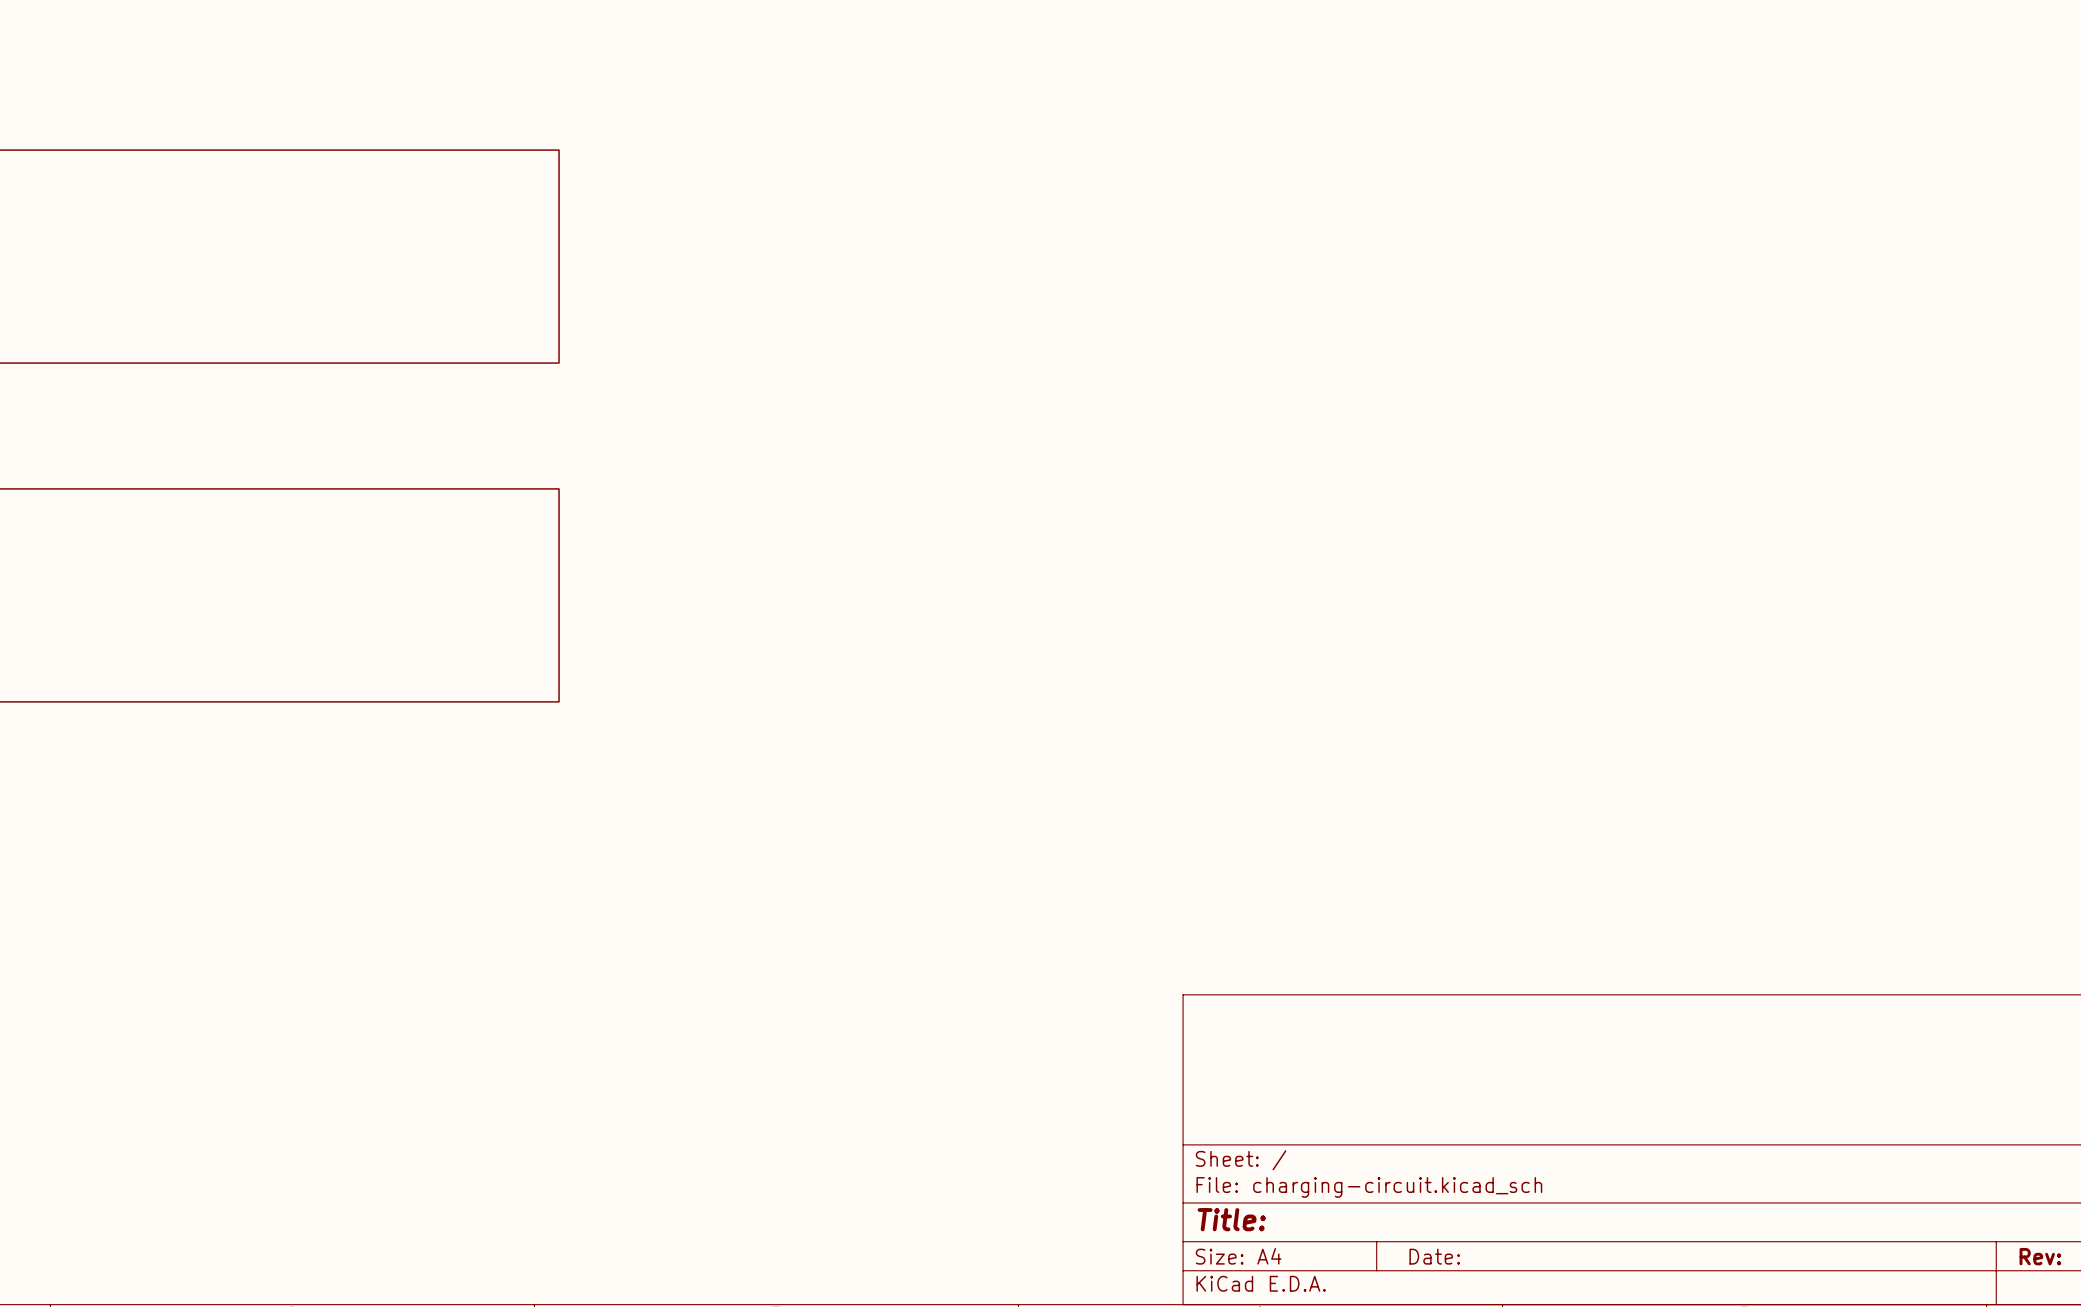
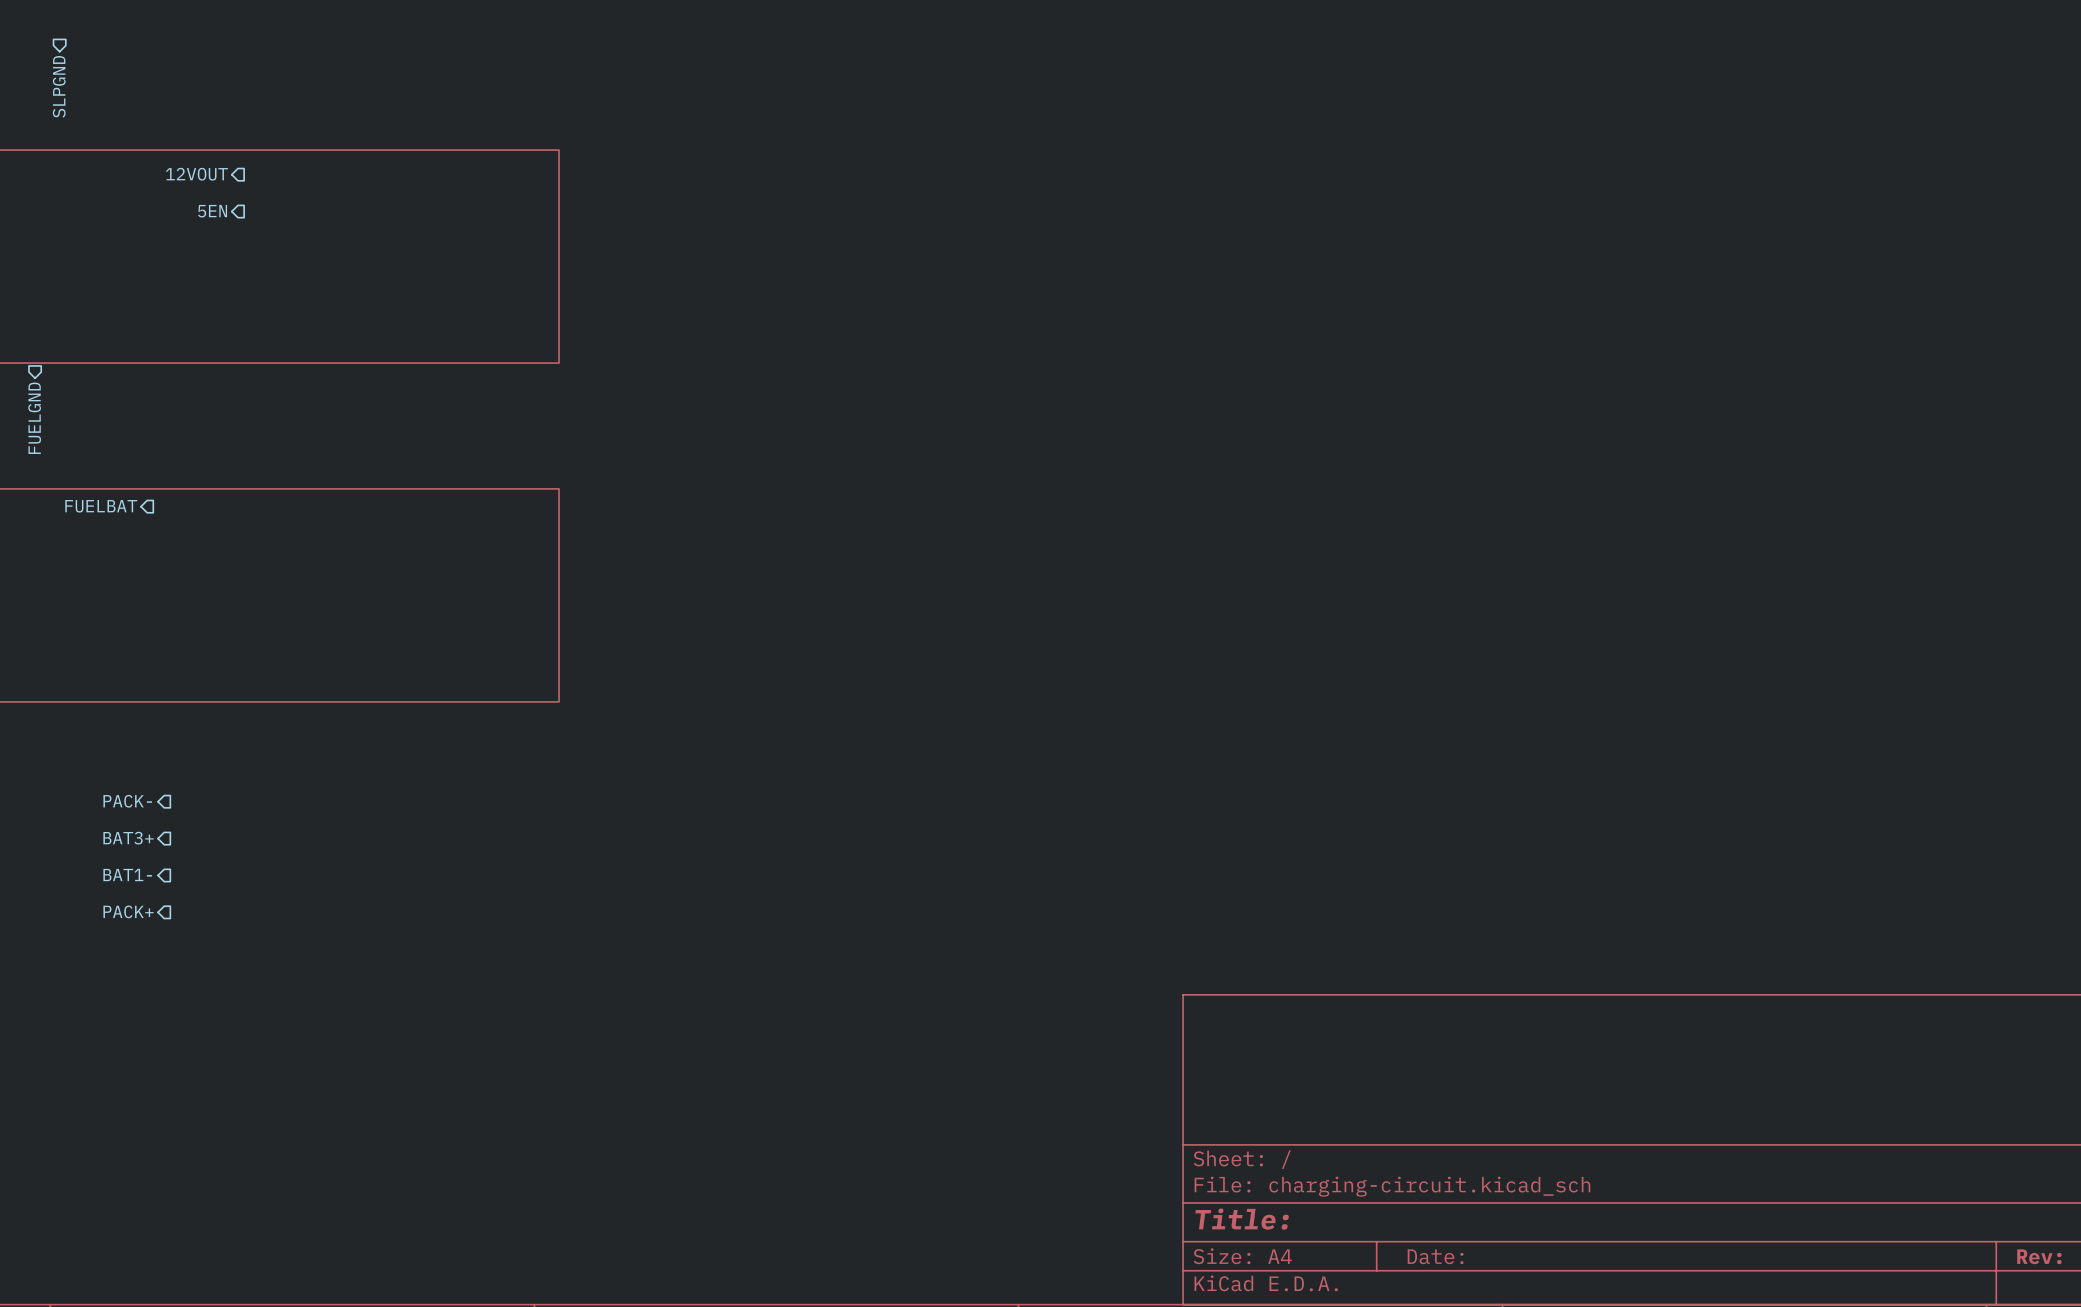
sheet pin: none -> SLPGND (59, 86)
sheet pin: none -> 12VOUT (197, 174)
sheet pin: none -> 5EN (212, 211)
sheet pin: none -> FUELGND (34, 418)
sheet pin: none -> FUELBAT (101, 506)
sheet pin: none -> PACK- (127, 801)
sheet pin: none -> BAT3+ (128, 838)
sheet pin: none -> BAT1- (127, 875)
sheet pin: none -> PACK+ (128, 911)

